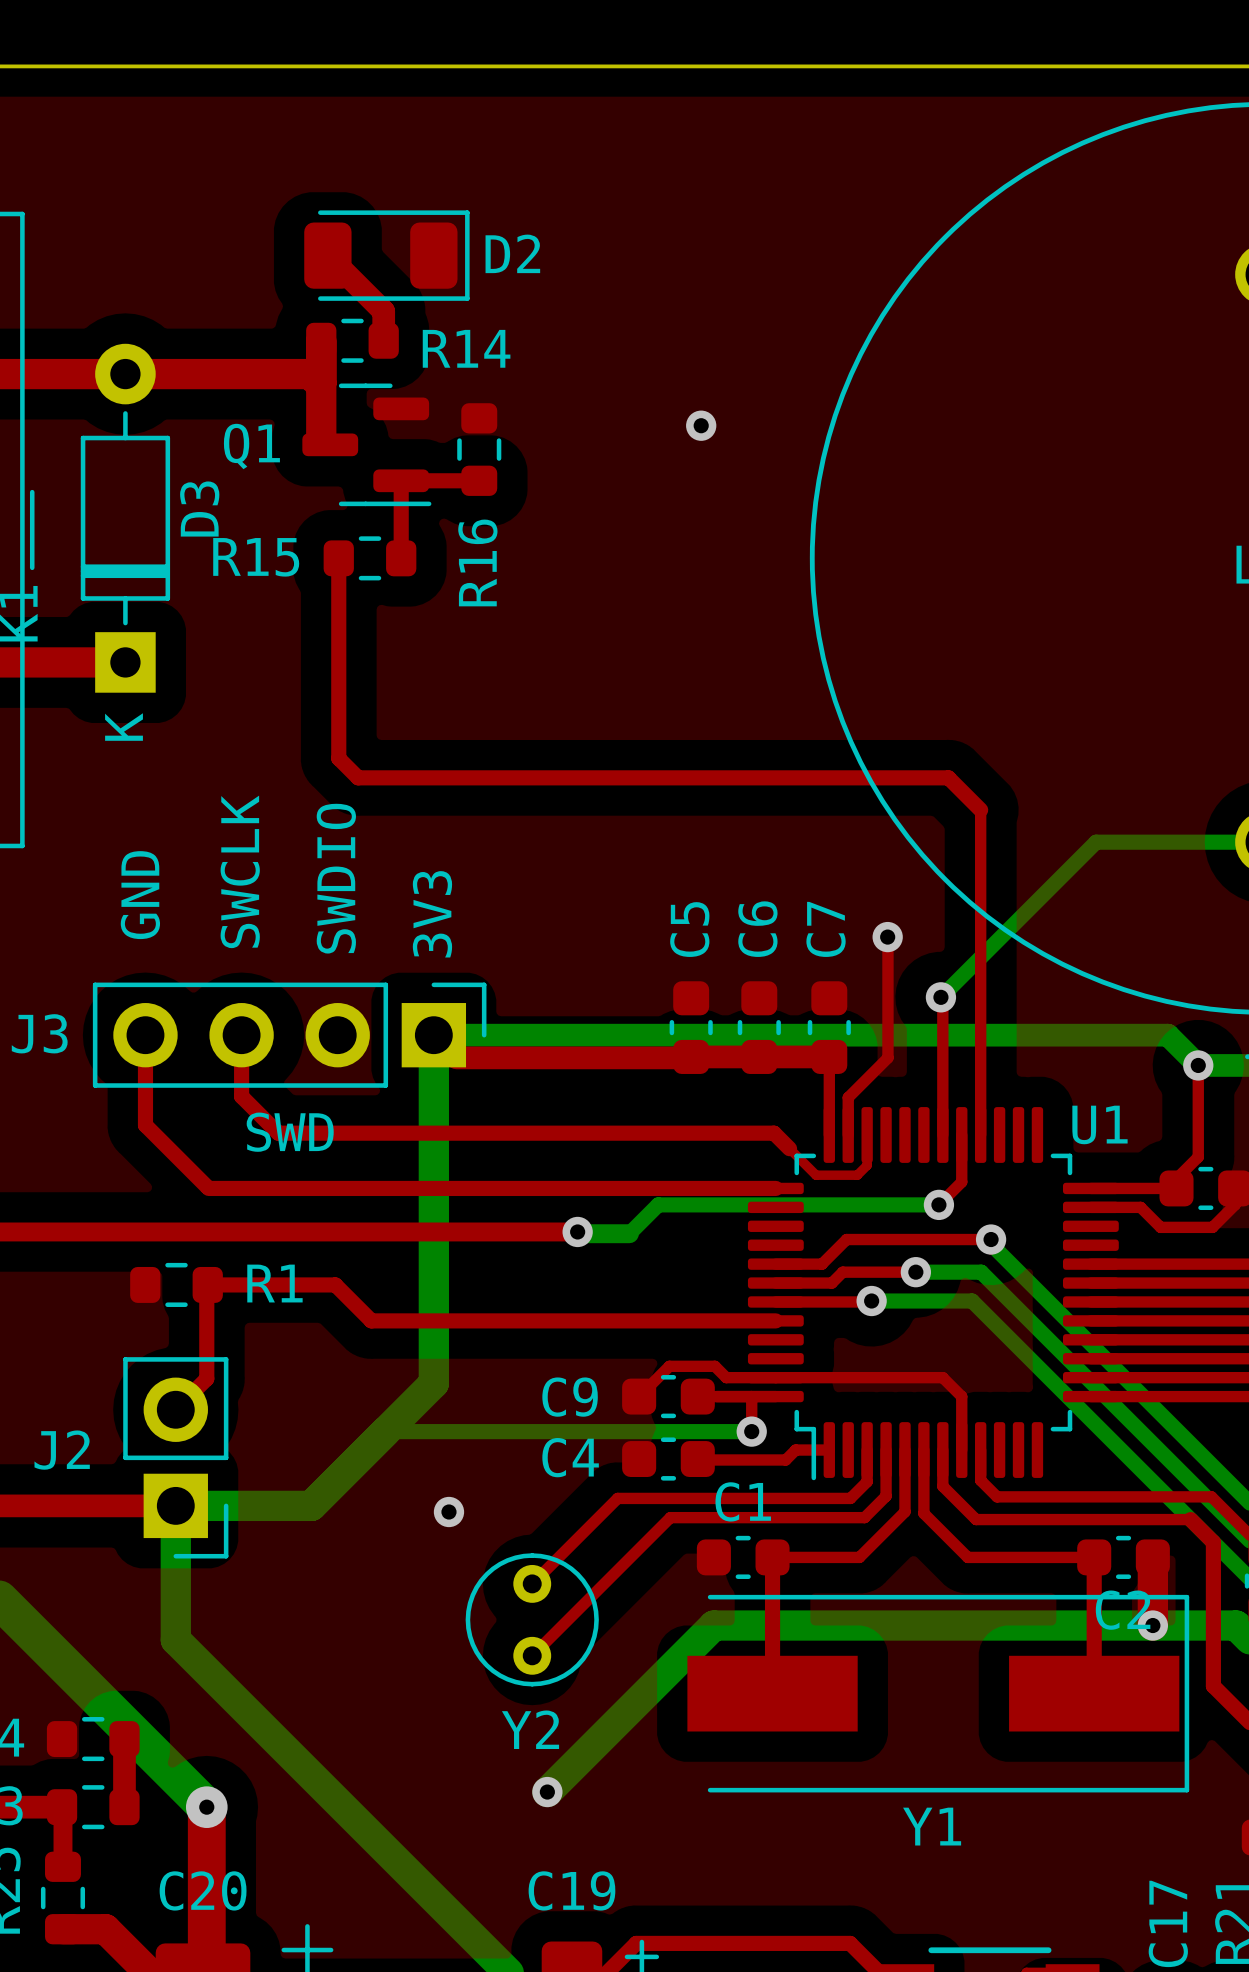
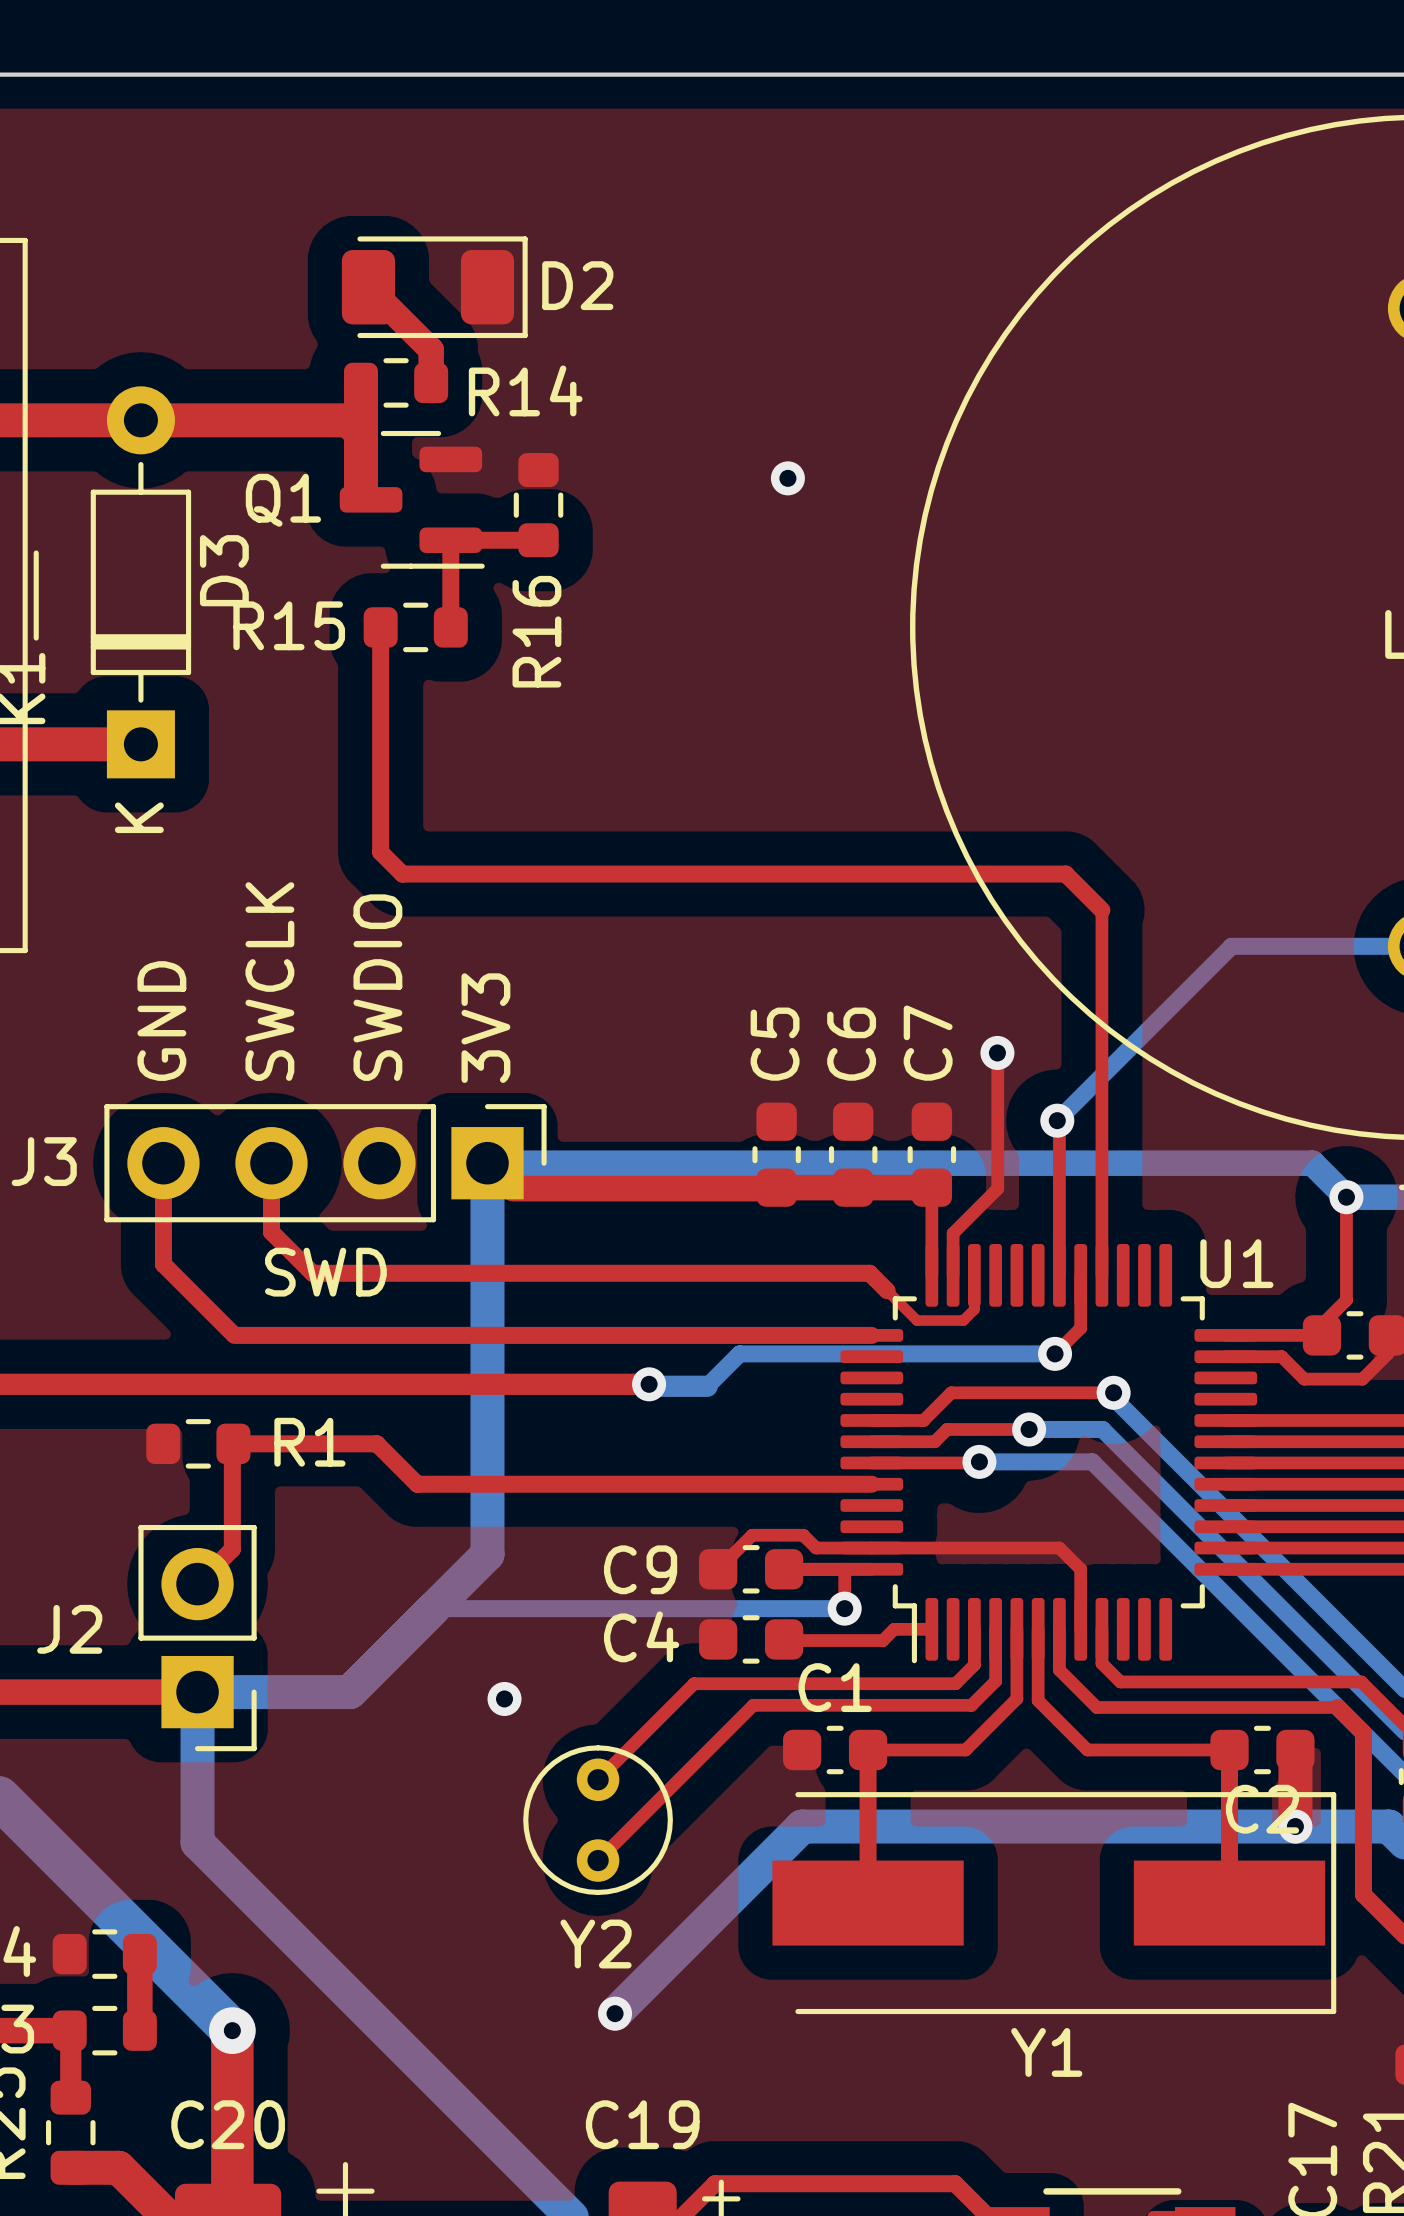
text position: GND (140, 895) -> GND (161, 1021)

